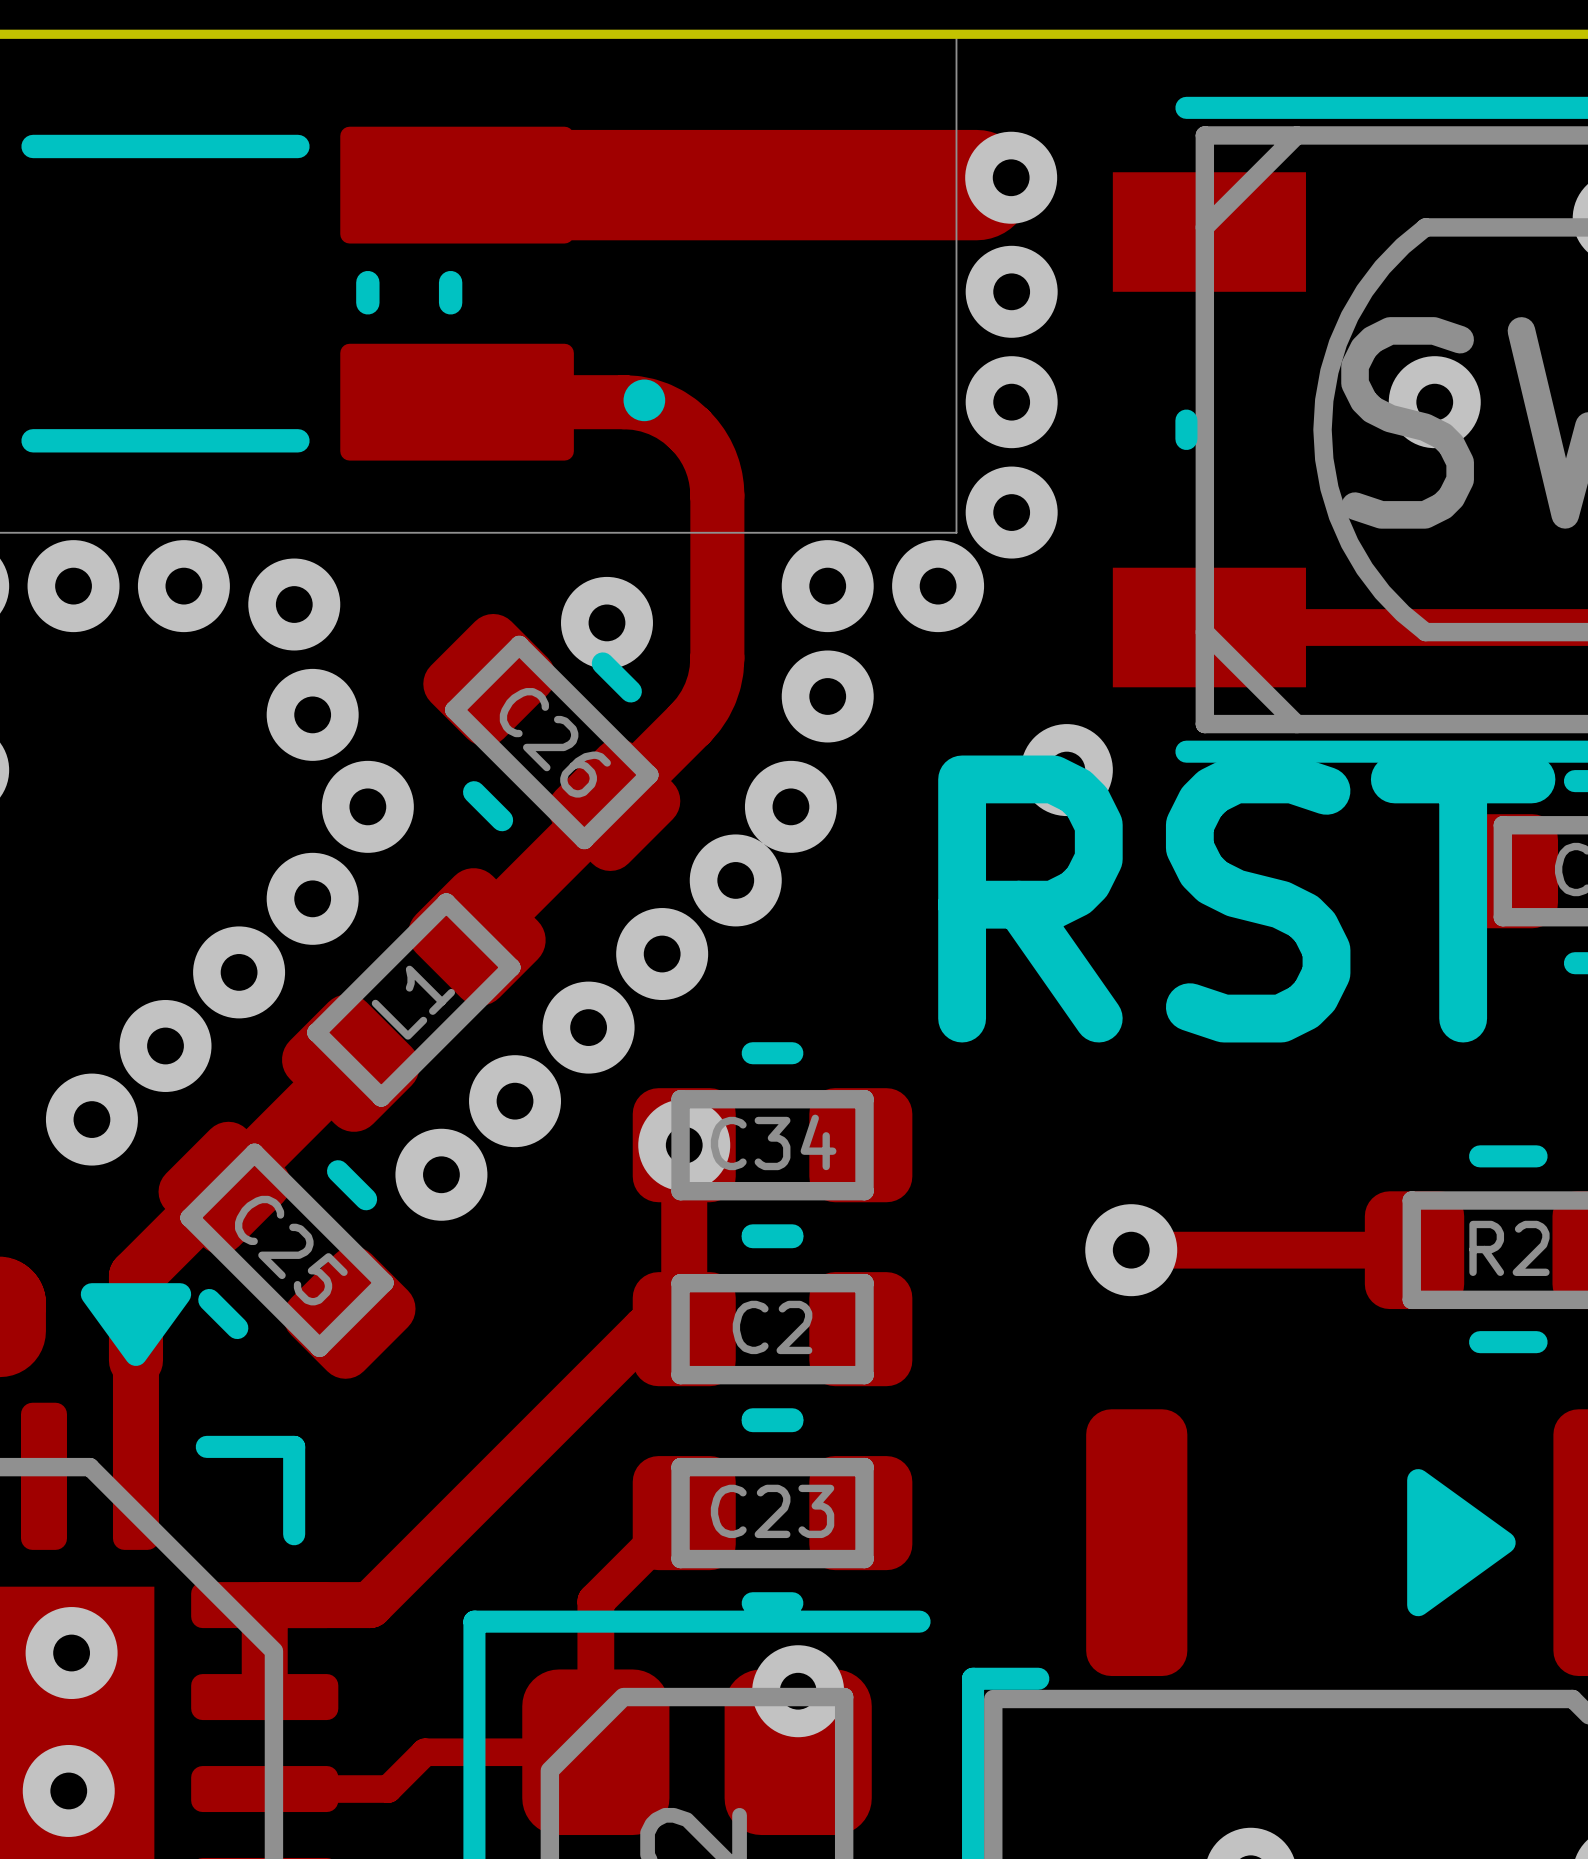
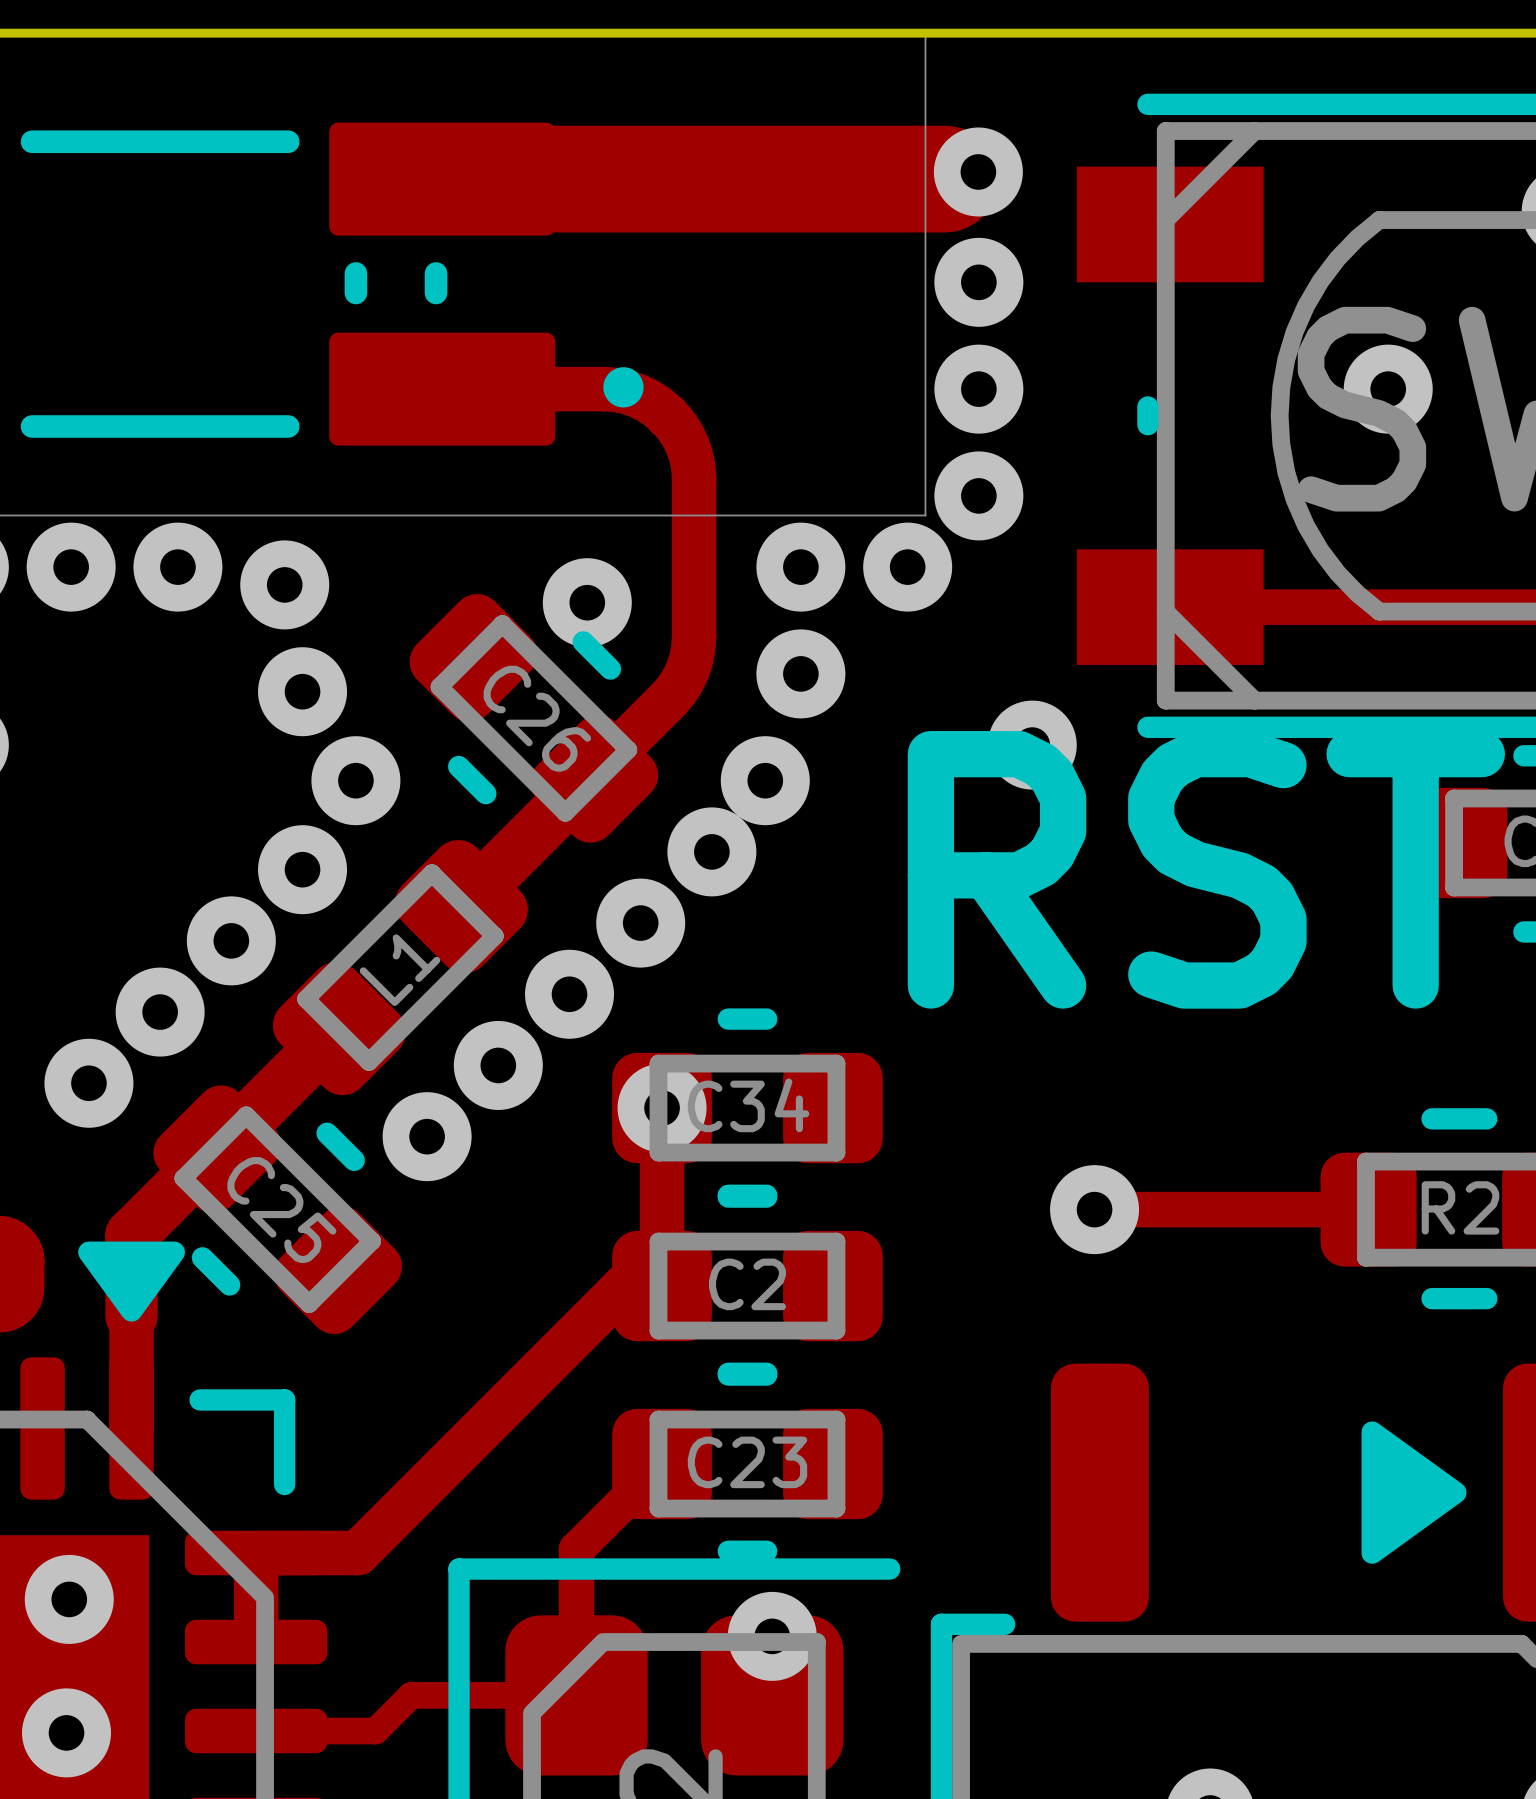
track width: thick (457, 402) (624, 402) (647, 405) (670, 414) (689, 429) (701, 444) (710, 460) (715, 477) (717, 495) (717, 658) (714, 682) (705, 704) (698, 714) (614, 799) -> thin (442, 389) (603, 389) (626, 392) (648, 401) (666, 415) (679, 429) (687, 445) (692, 462) (694, 479) (694, 637) (691, 660) (682, 681) (675, 691) (594, 773)

